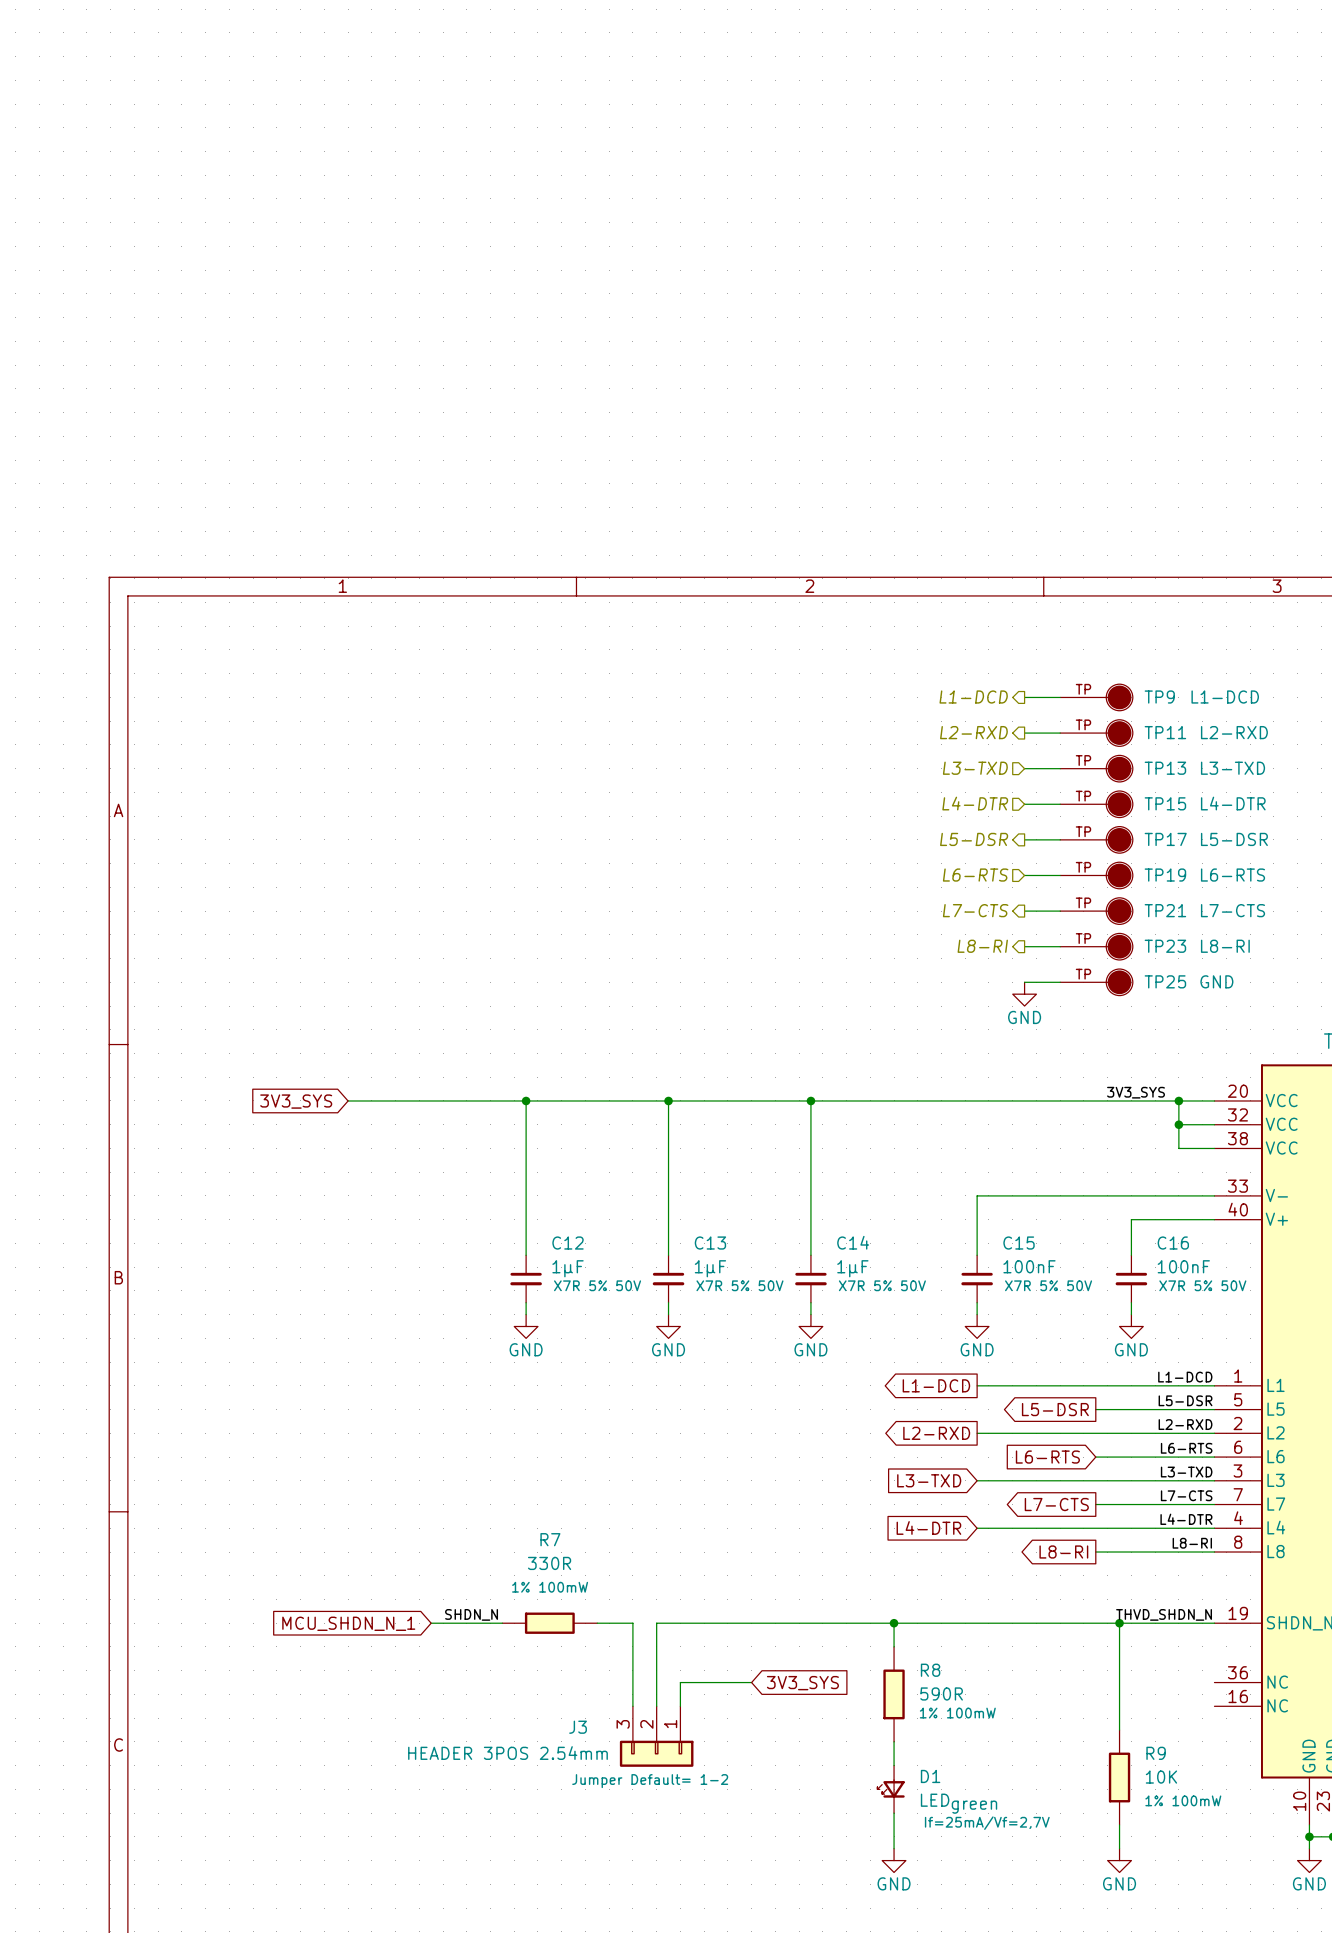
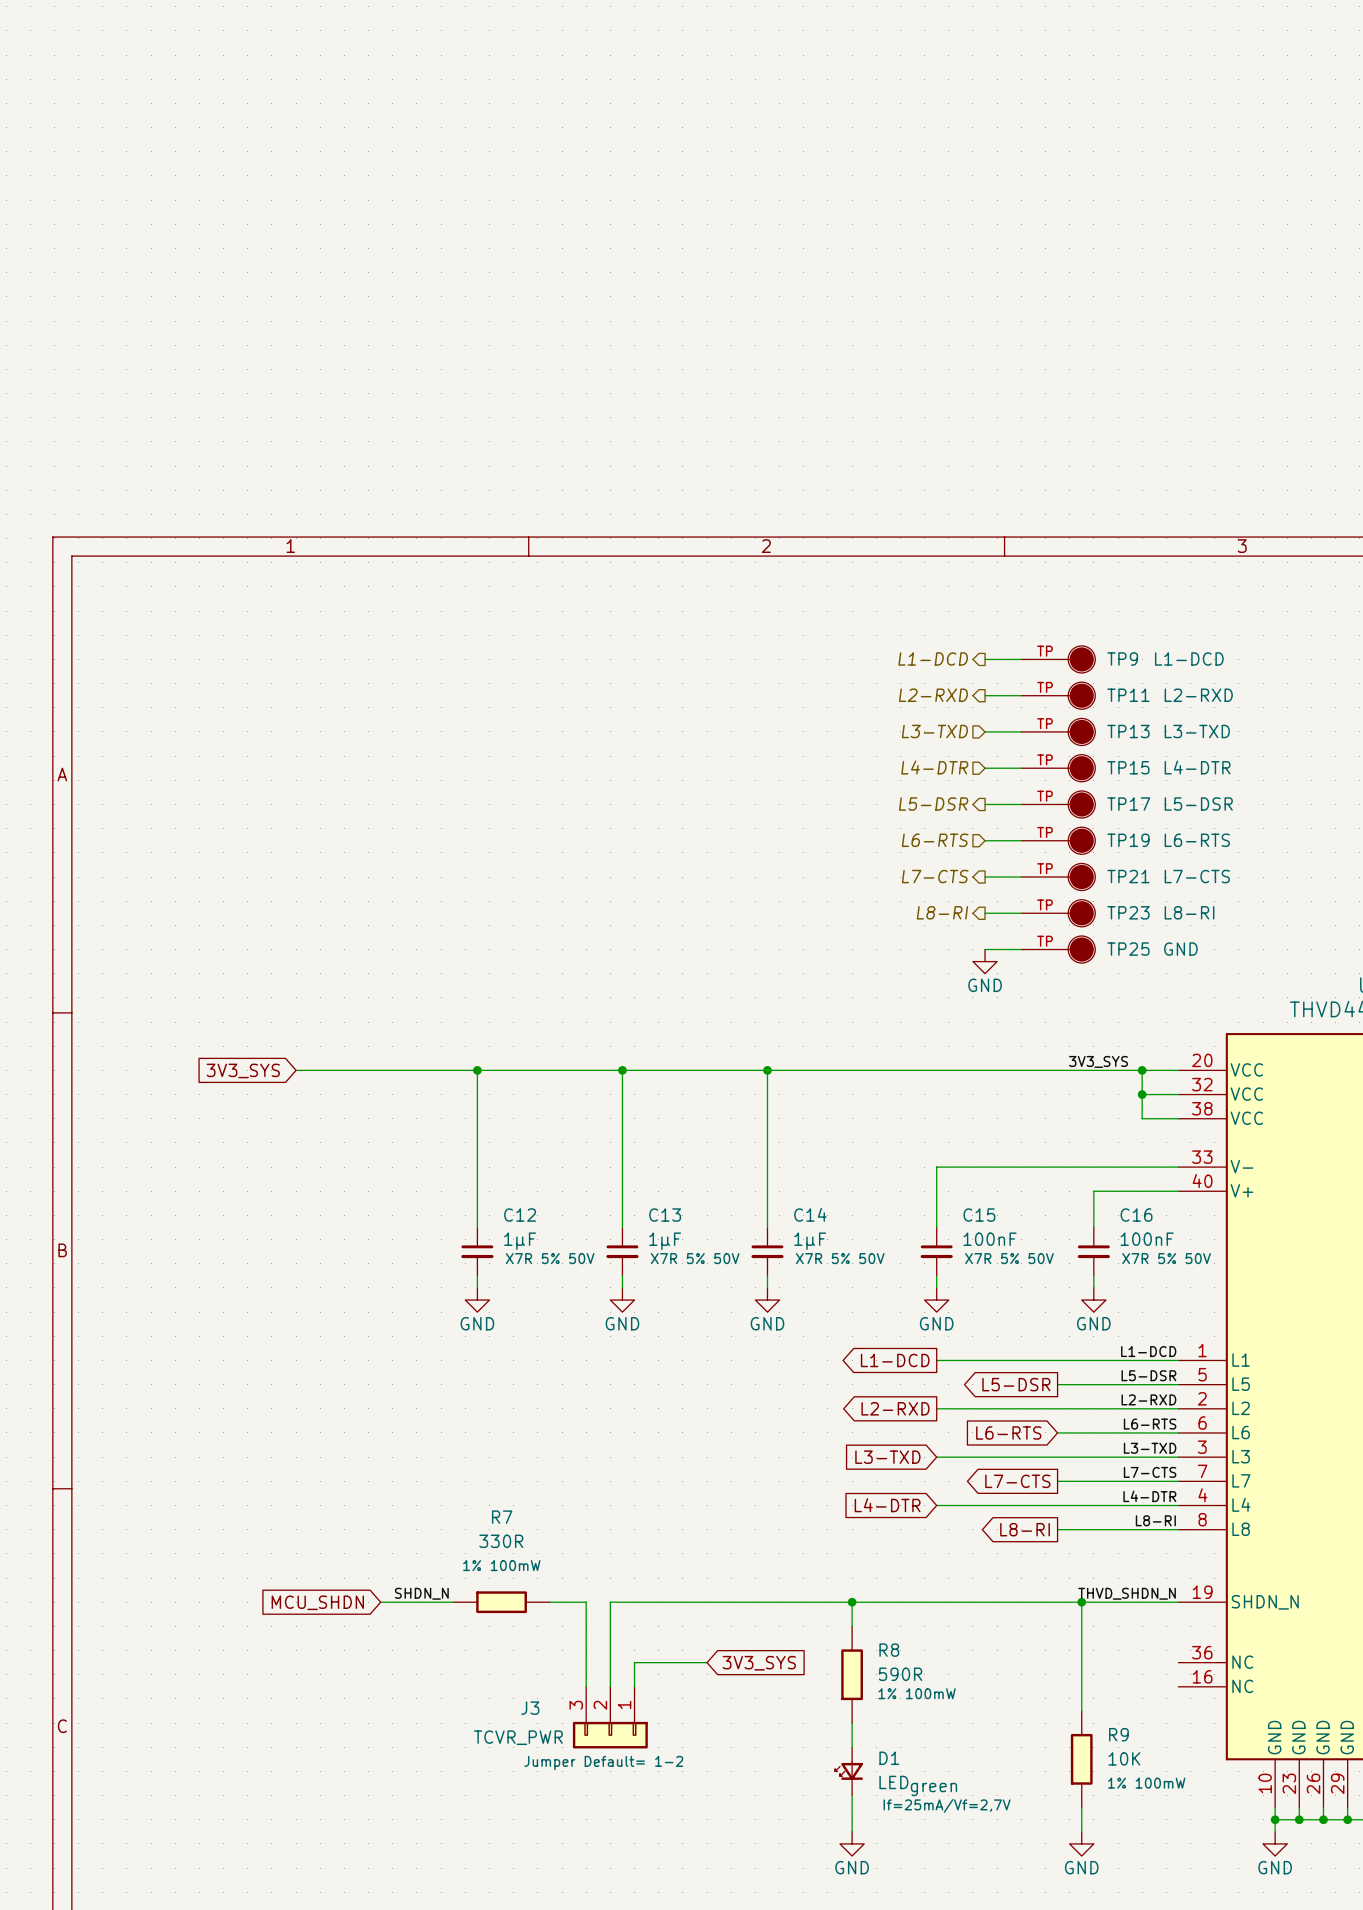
global label: MCU_SHDN_N_1 (348, 1623) -> MCU_SHDN (317, 1602)
J3 value: HEADER 3POS 2.54mm (507, 1753) -> TCVR_PWR (518, 1737)

